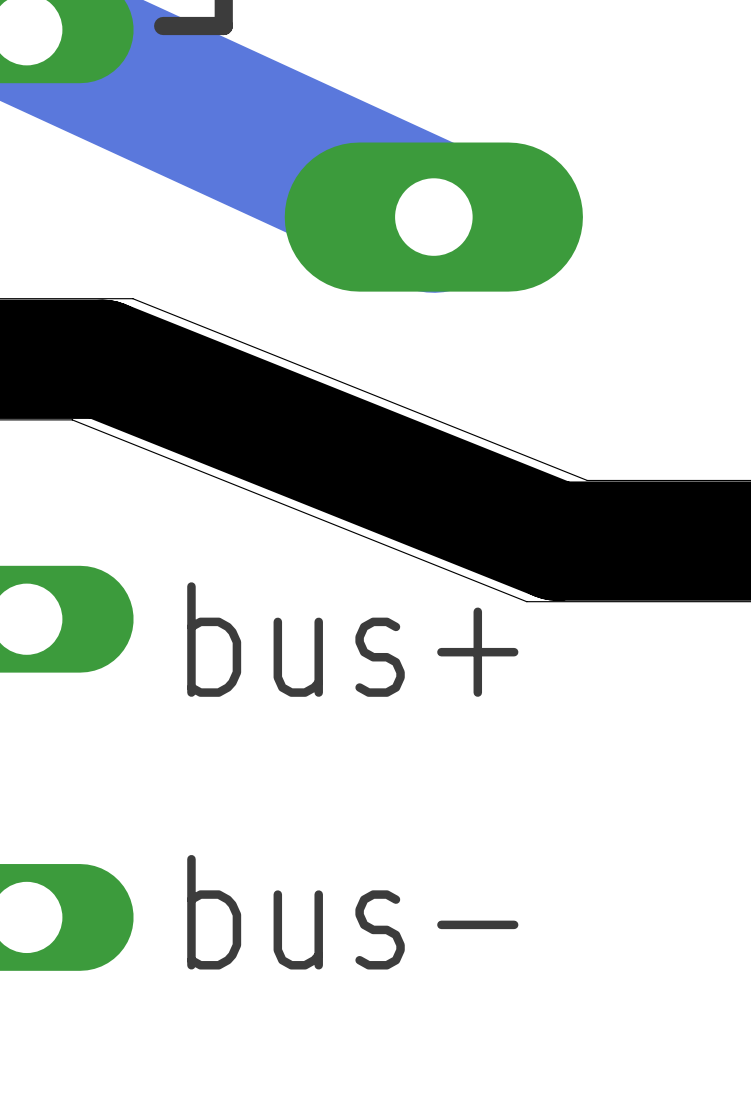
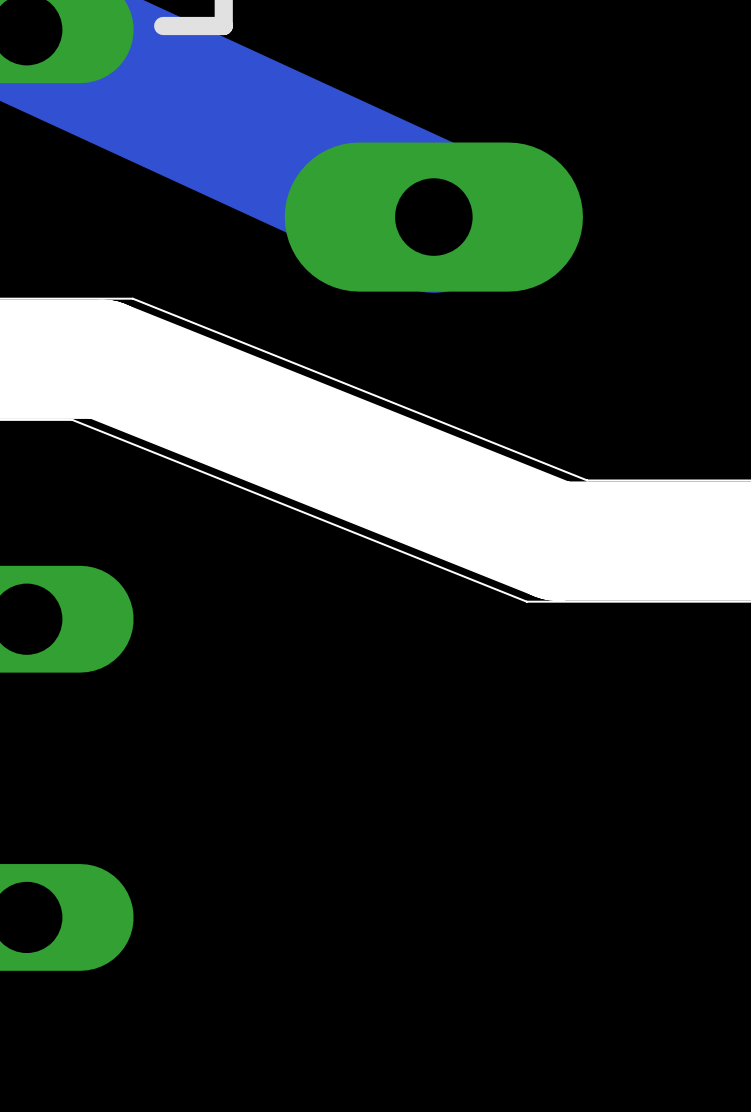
text: bus+ (352, 639) -> none
text: bus- (352, 912) -> none

